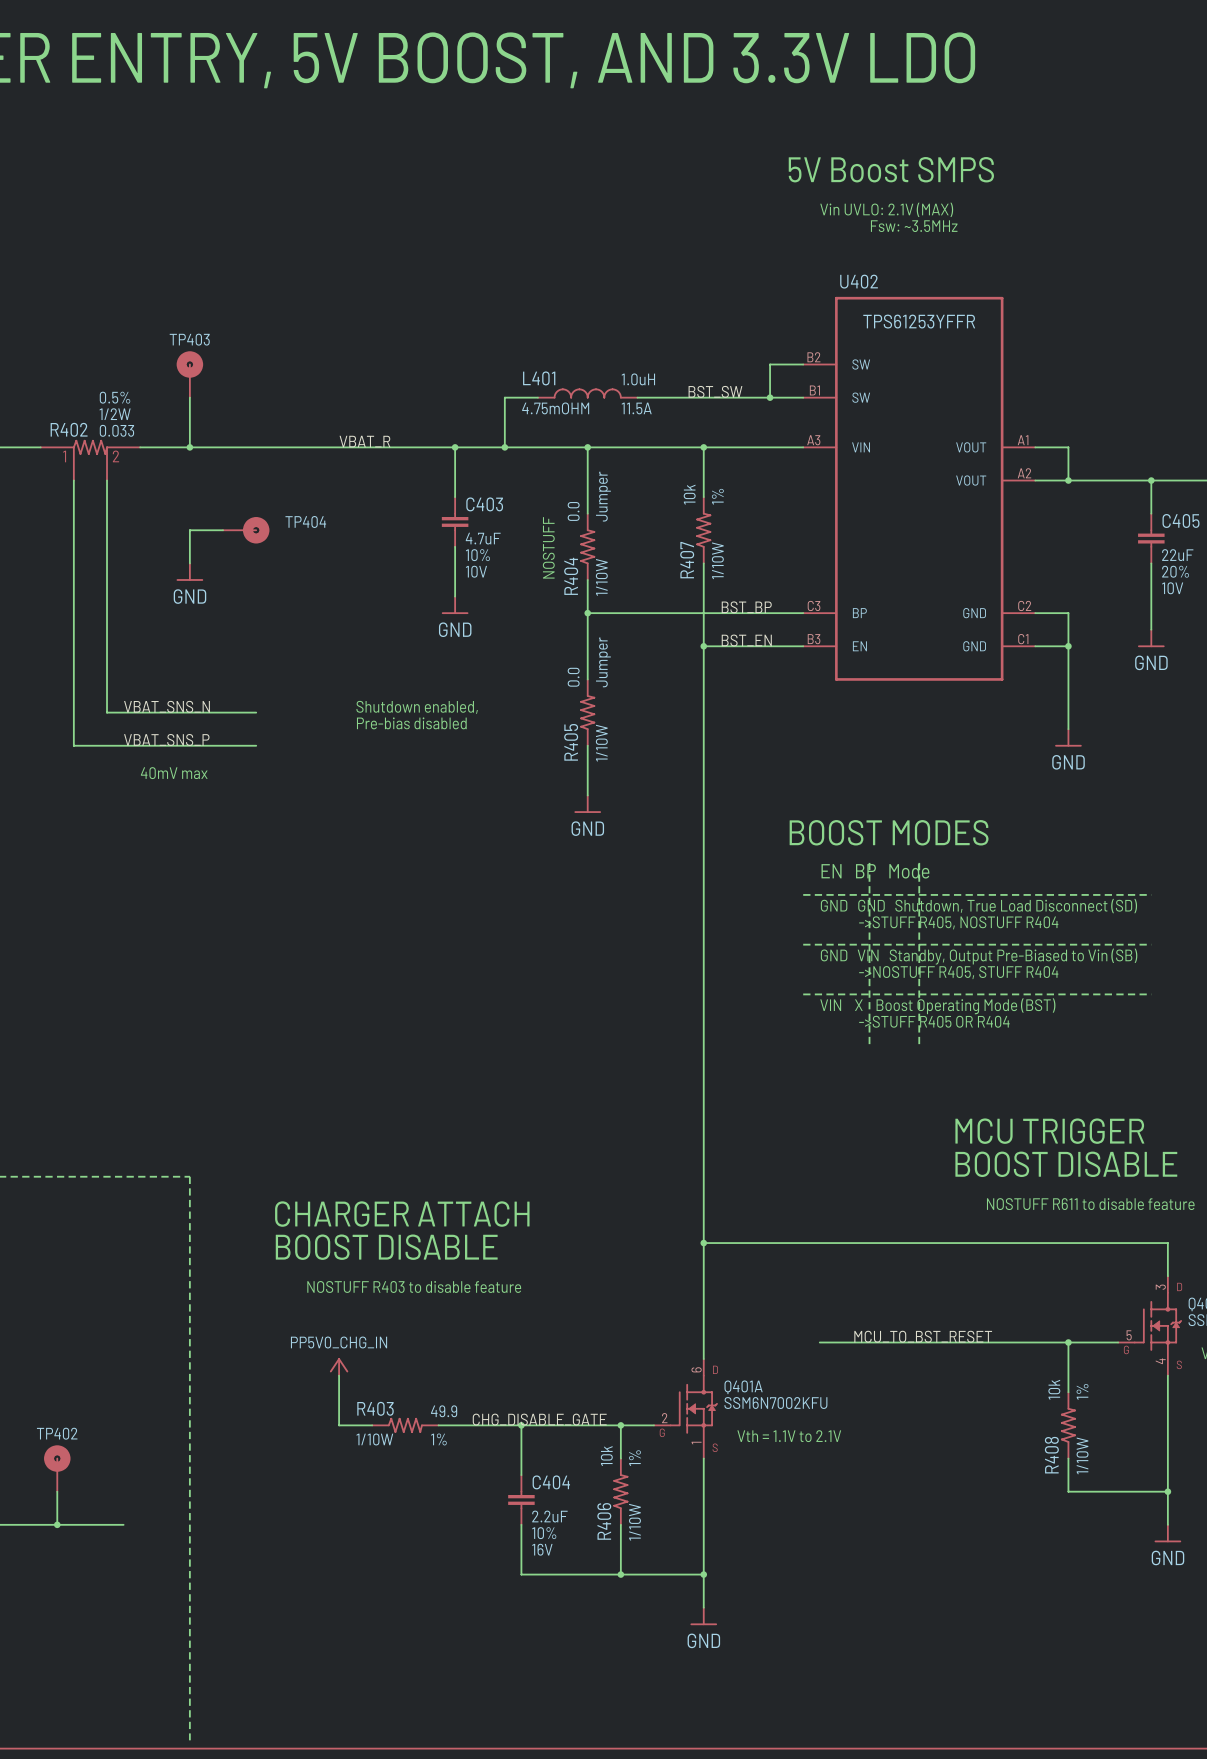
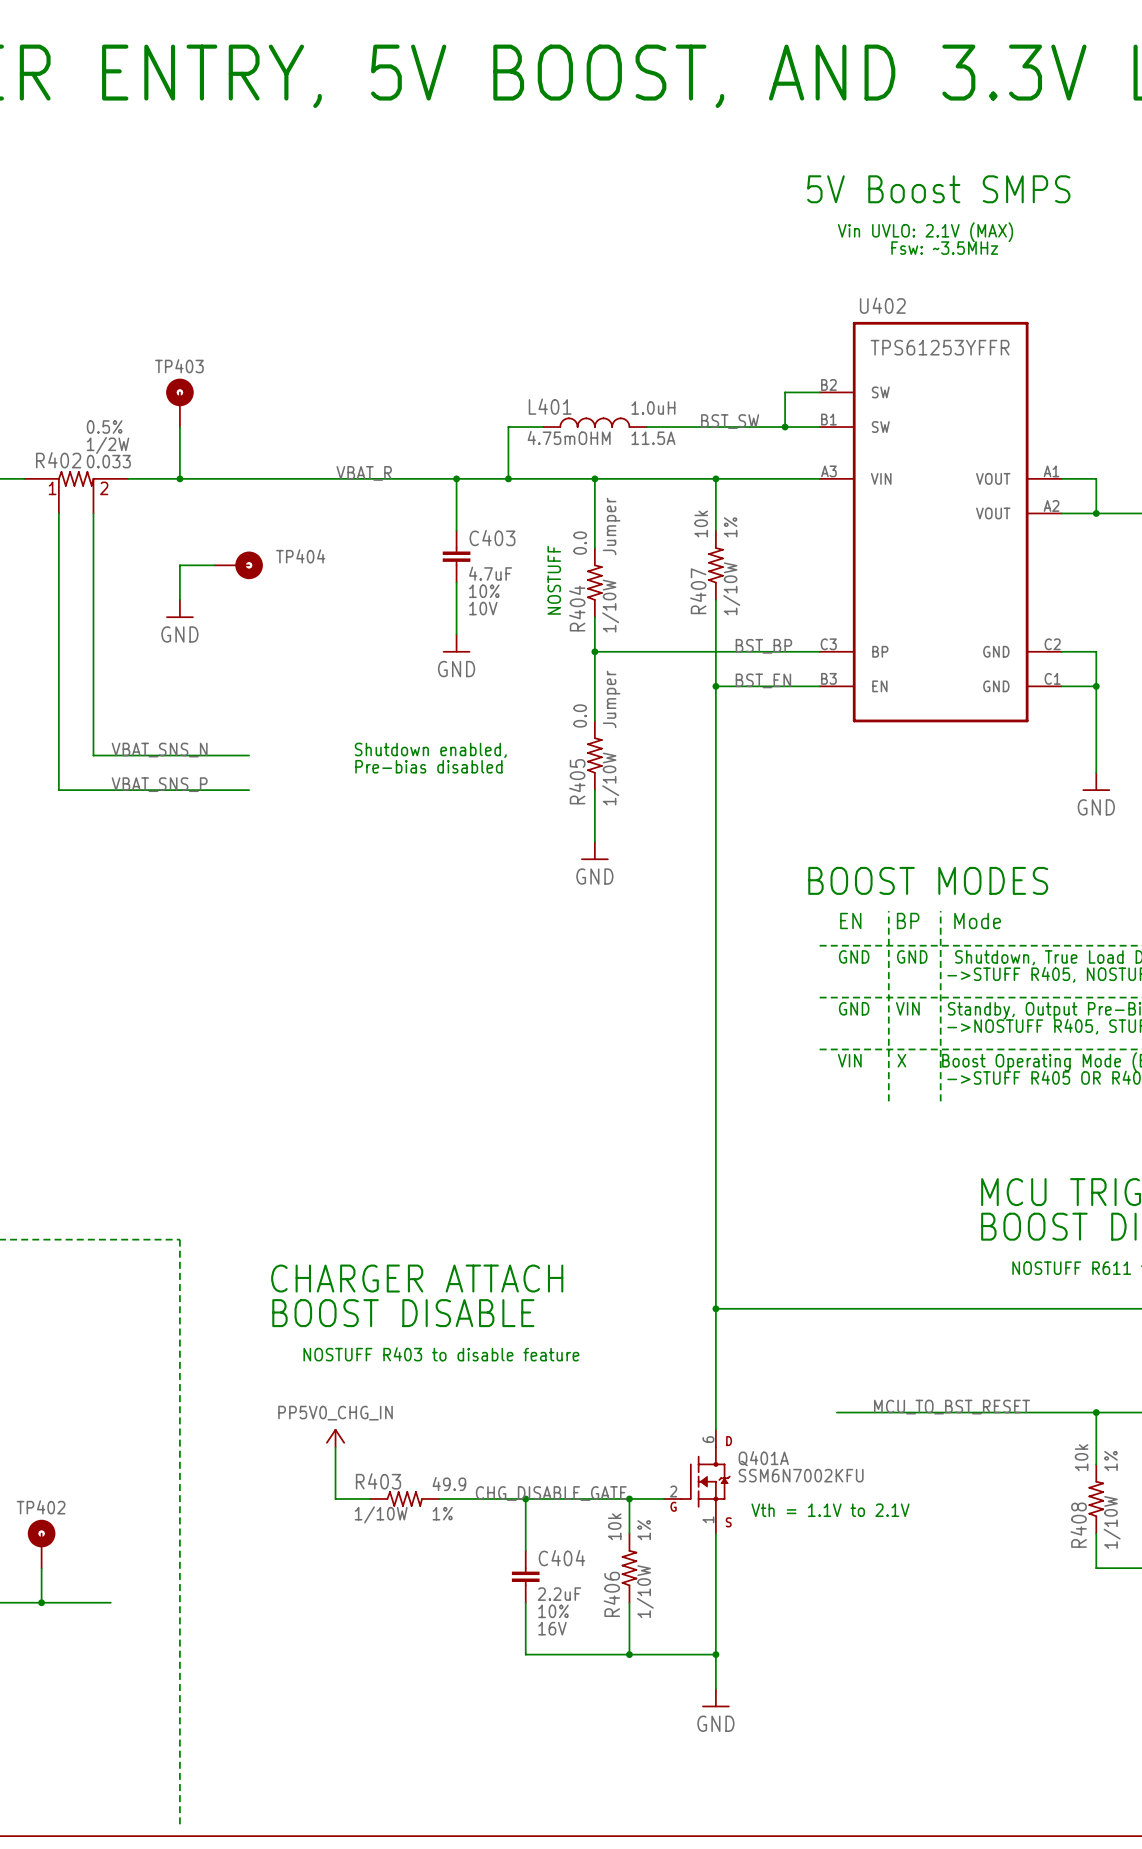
text: 40mV max (174, 773) -> none

